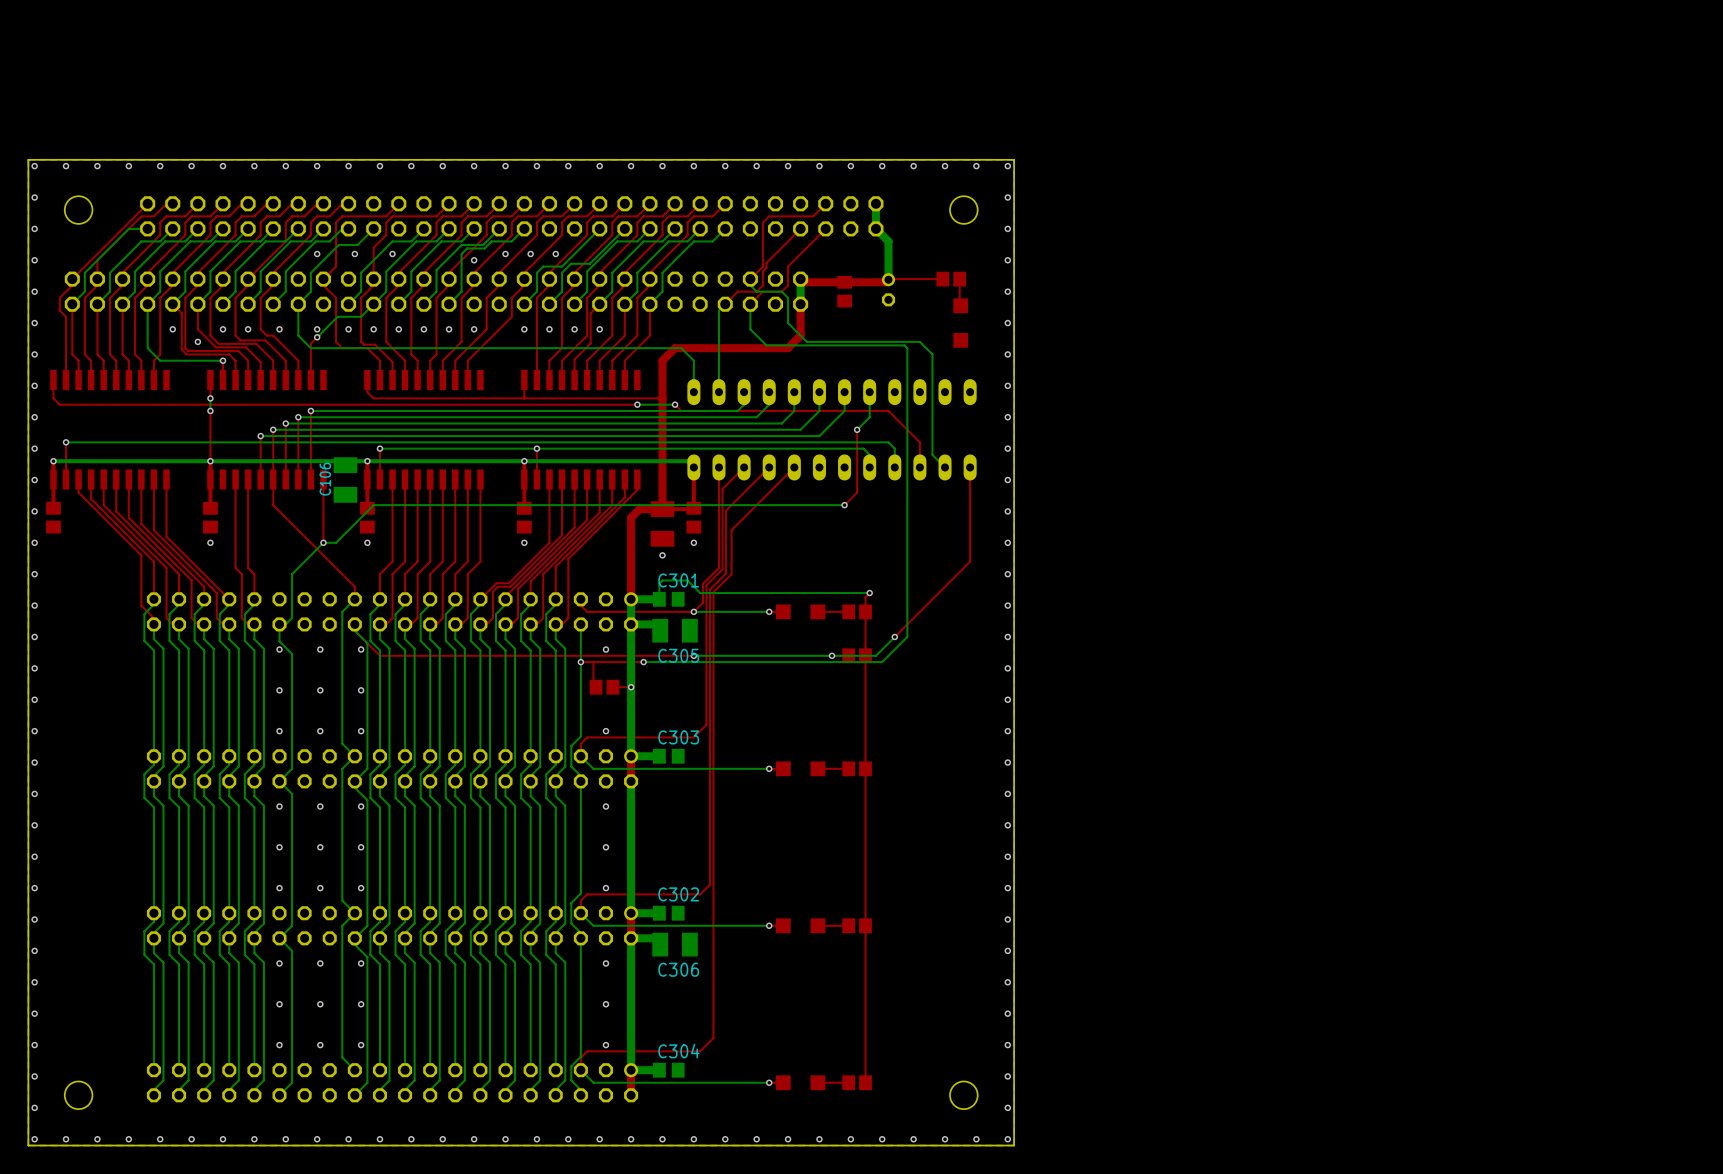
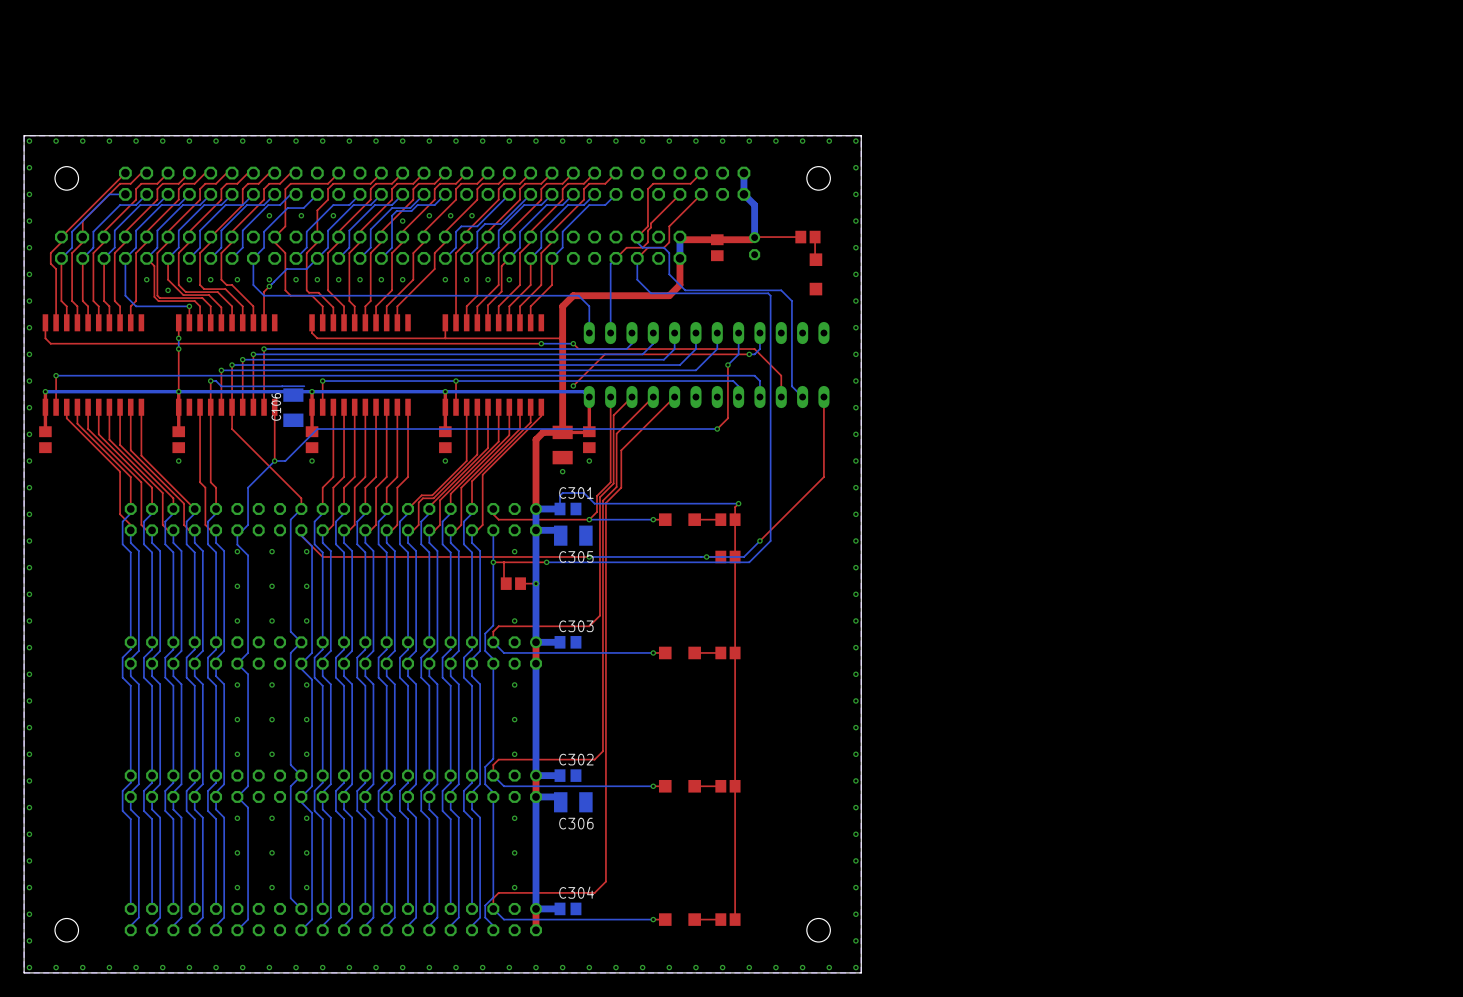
bottom track: none -> (759, 333) (759, 349) (754, 354) (749, 354)
top track: none -> (749, 354) (604, 354) (573, 385)
via: none -> (749, 354)
top track: none -> (210, 381) (210, 407)
bottom track: none -> (210, 381) (216, 381) (221, 386) (282, 386)
via: none -> (210, 381)
bottom track: none -> (304, 386) (282, 386)
via: none -> (573, 385)

